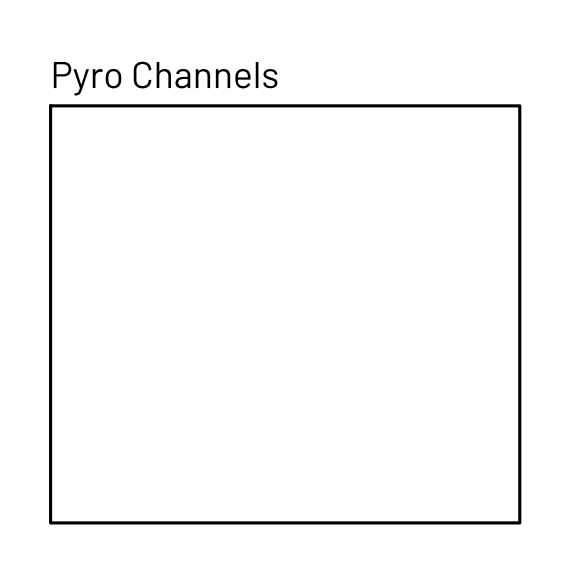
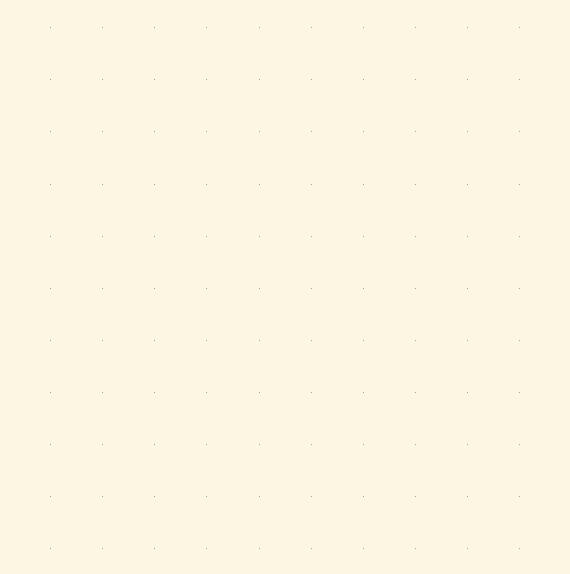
sheet Pyro Channels: (285, 314) -> none

